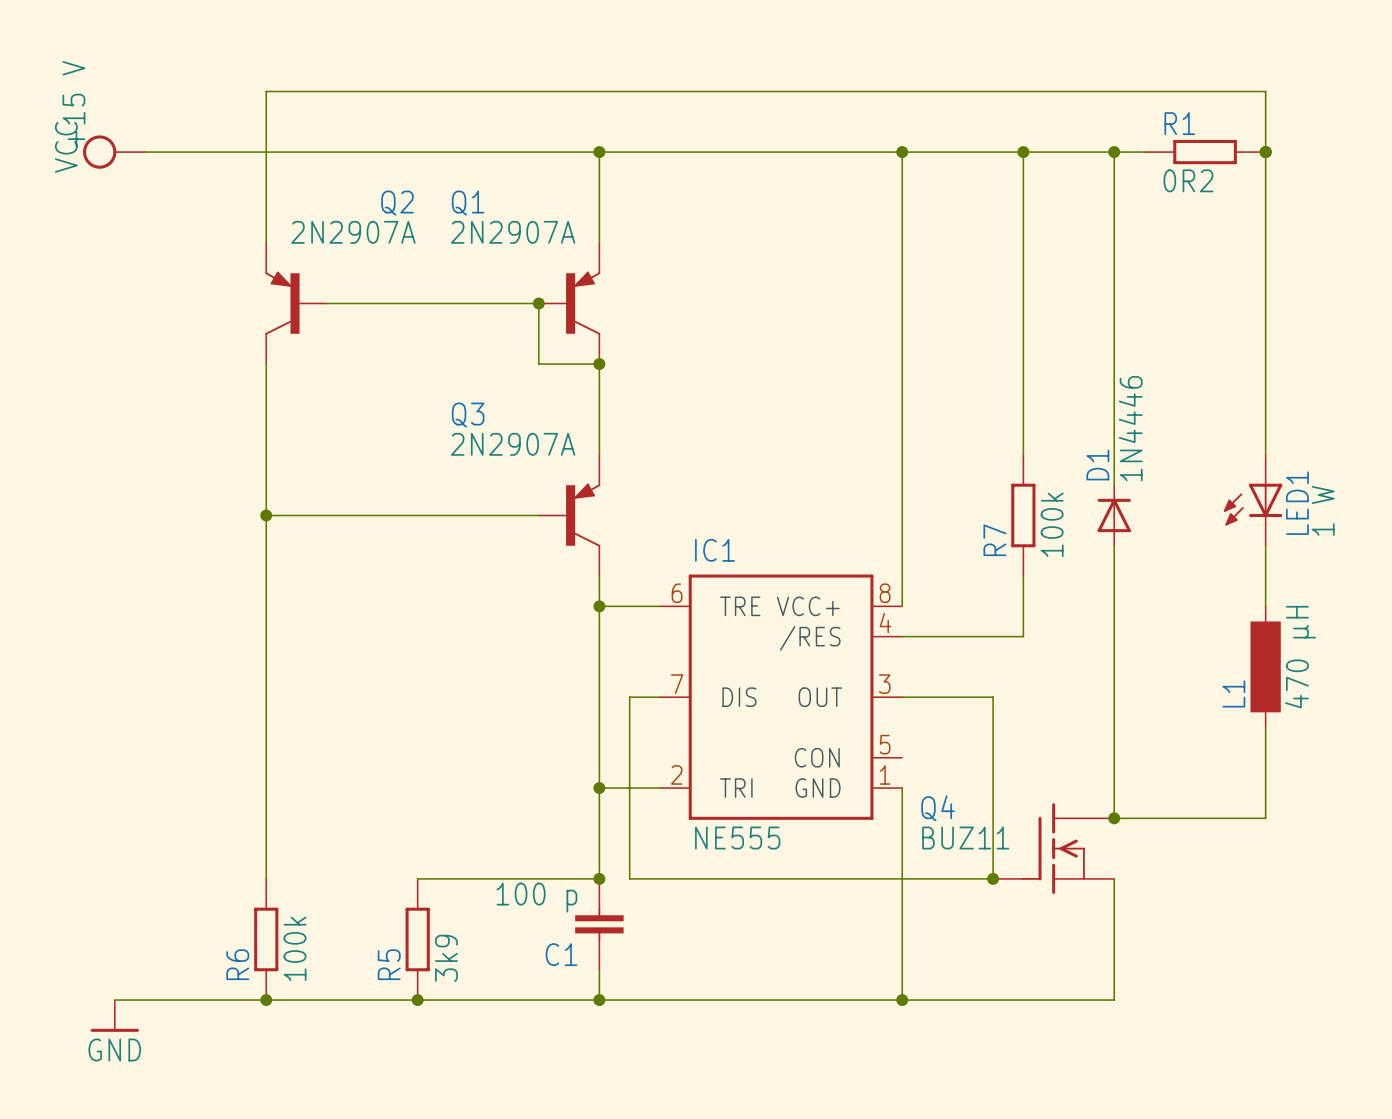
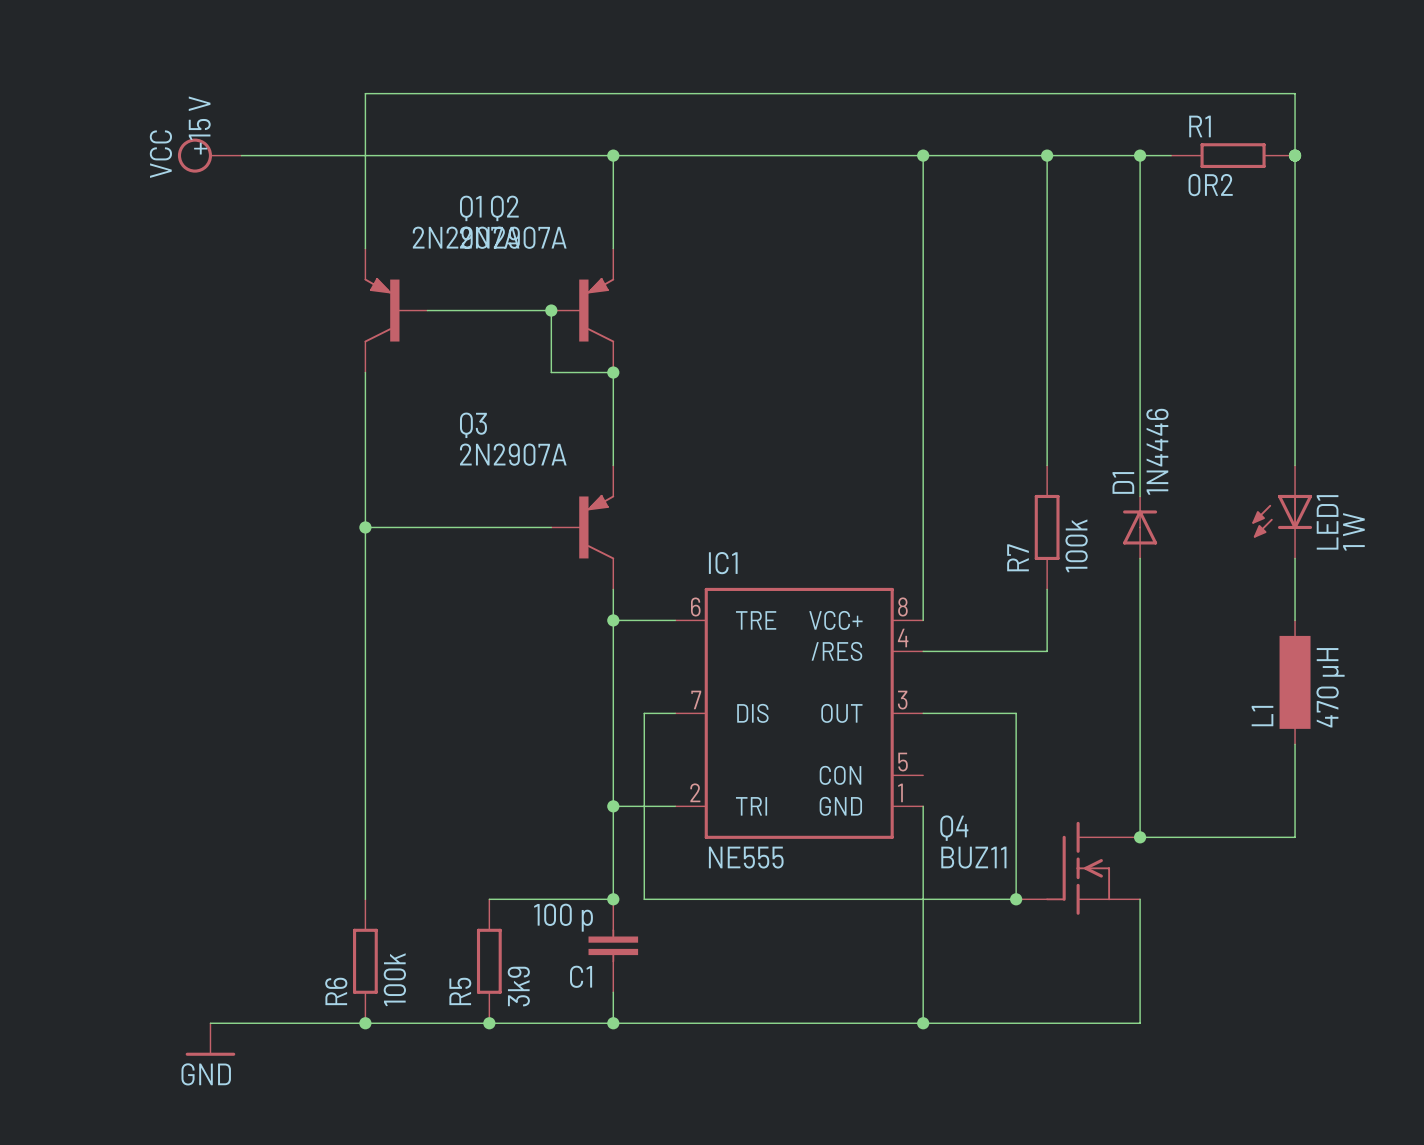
wire: (357, 91) (266, 91) (266, 242) -> (365, 93) (365, 248)
power symbol text position: +15 V (73, 104) -> +15 V (199, 125)
power symbol position: VCC (114, 152) -> VCC (209, 155)
wire: (145, 152) (235, 152) -> none
Q2 position: (296, 303) -> (395, 310)
wire: (326, 303) (417, 303) -> none
wire: (266, 364) (266, 878) -> (365, 372) (365, 899)
wire: (266, 515) (357, 515) -> none
junction: (266, 515) -> none
junction: none -> (365, 527)
wire: (417, 878) (478, 878) -> none
R6 position: (266, 939) -> (365, 961)
R5 position: (417, 939) -> (489, 961)
wire: (114, 1000) (205, 1000) -> none
junction: (266, 1000) -> none
junction: none -> (365, 1023)
junction: (417, 1000) -> none
junction: none -> (489, 1023)
power symbol position: GND (114, 1015) -> GND (210, 1039)

